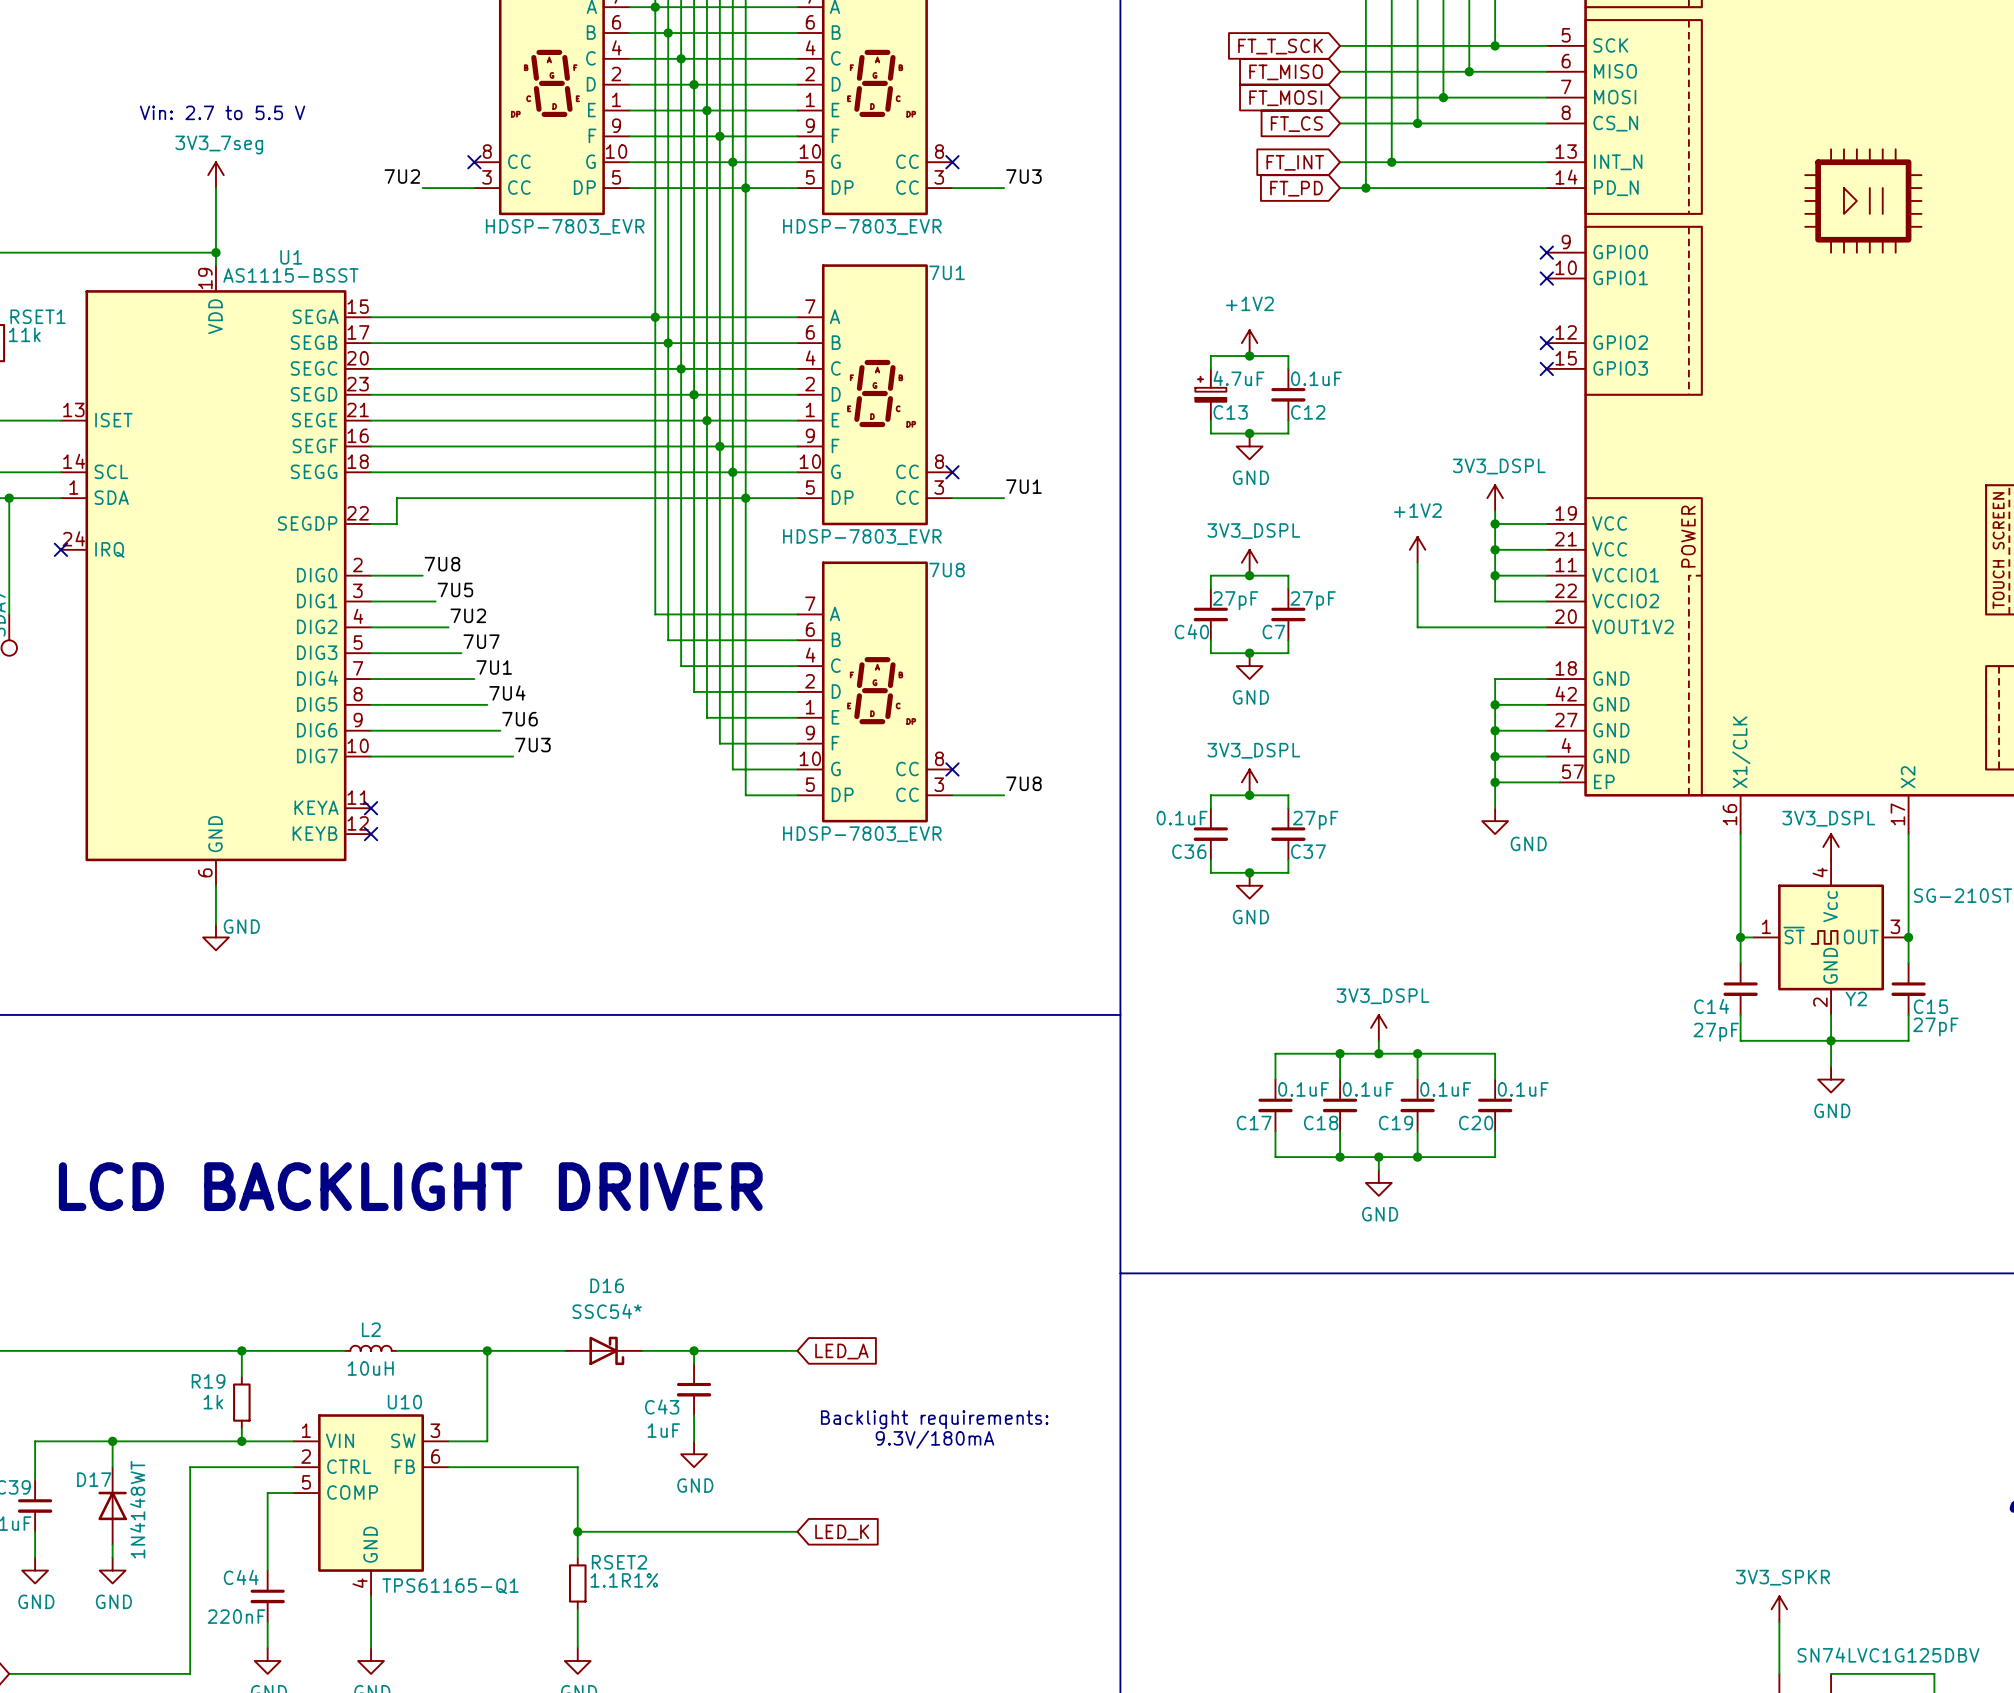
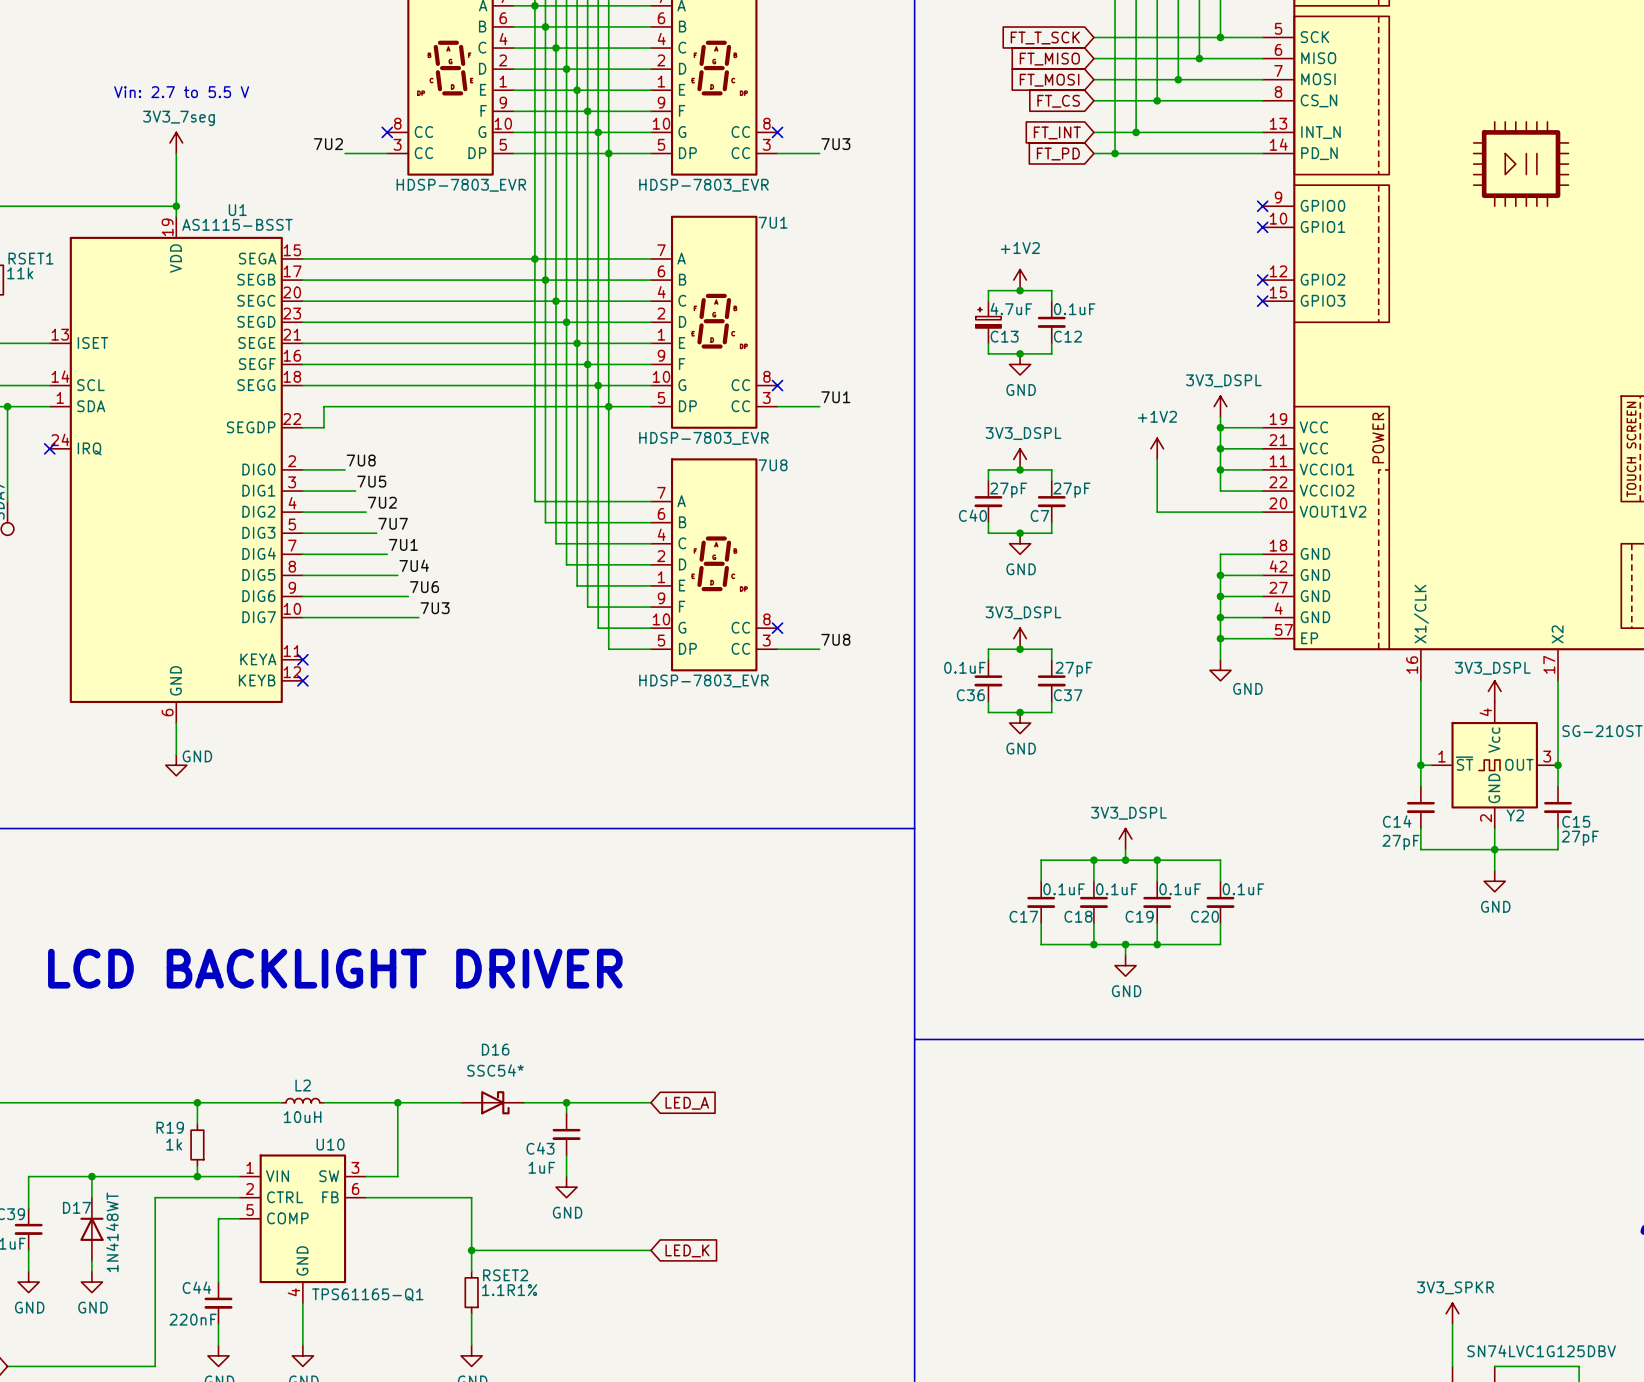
text: Backlight requirements: (934, 1419) -> none
text: 9.3V/180mA (934, 1439) -> none

